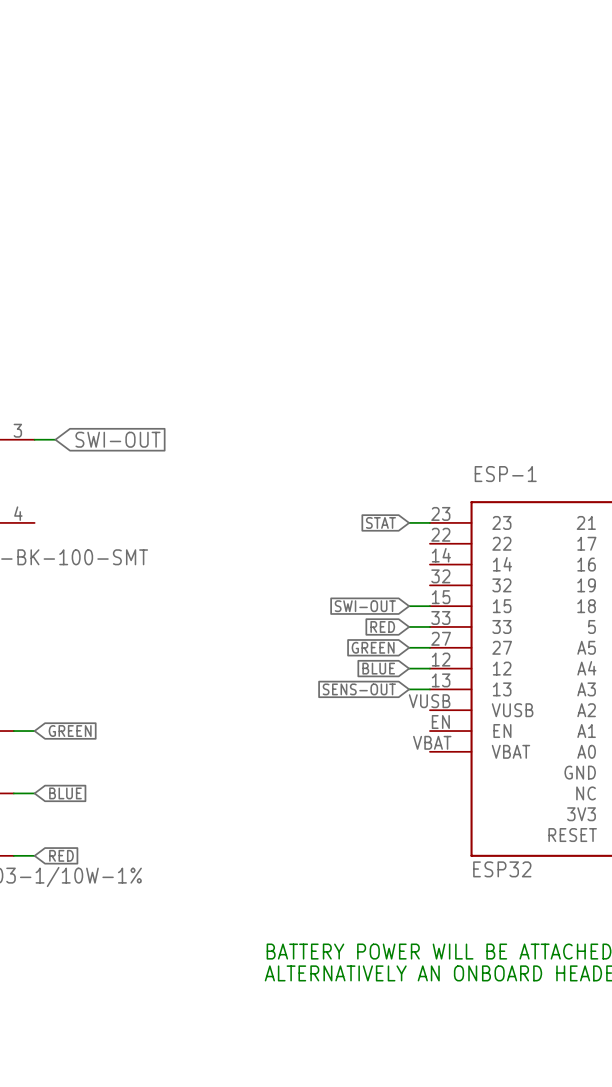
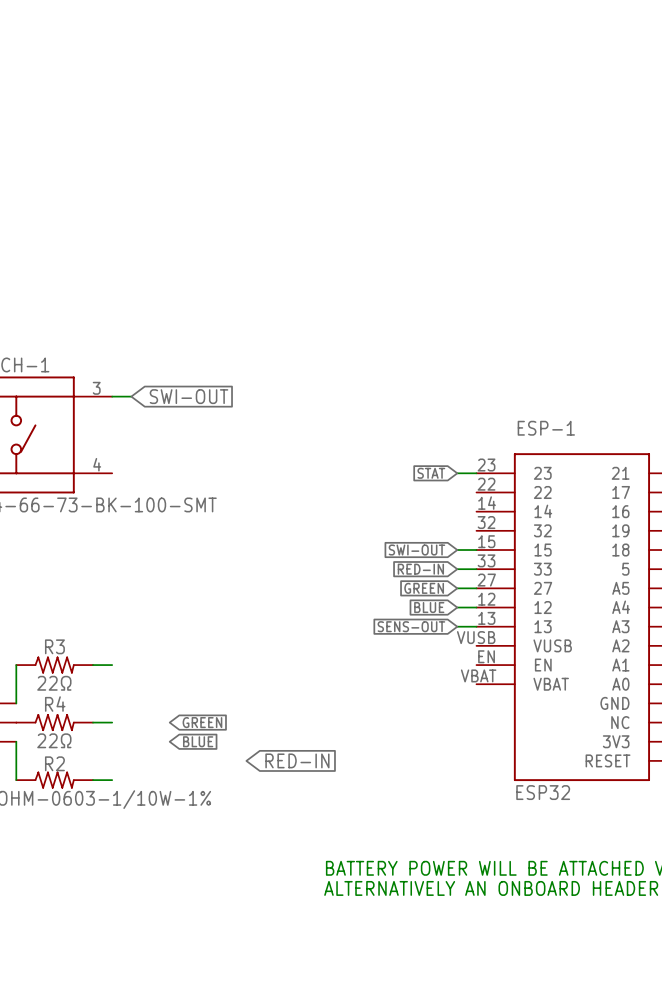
global label: RED (382, 626) -> RED-IN (420, 569)
global label position: GREEN (70, 731) -> GREEN (202, 722)
global label position: BLUE (65, 793) -> BLUE (198, 741)
global label: none -> RED-IN (297, 760)
global label: RED (61, 855) -> none

